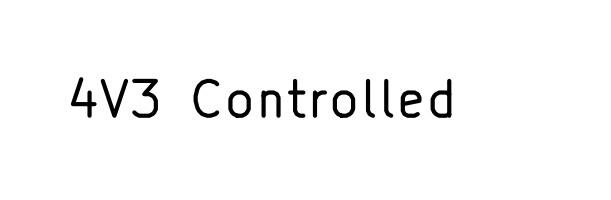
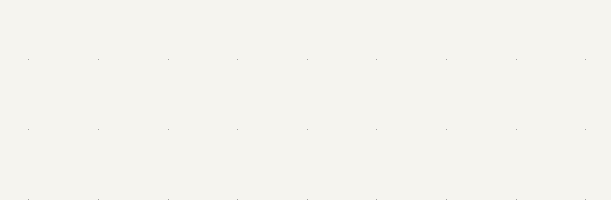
label: 4V3 Controlled (261, 97) -> none

